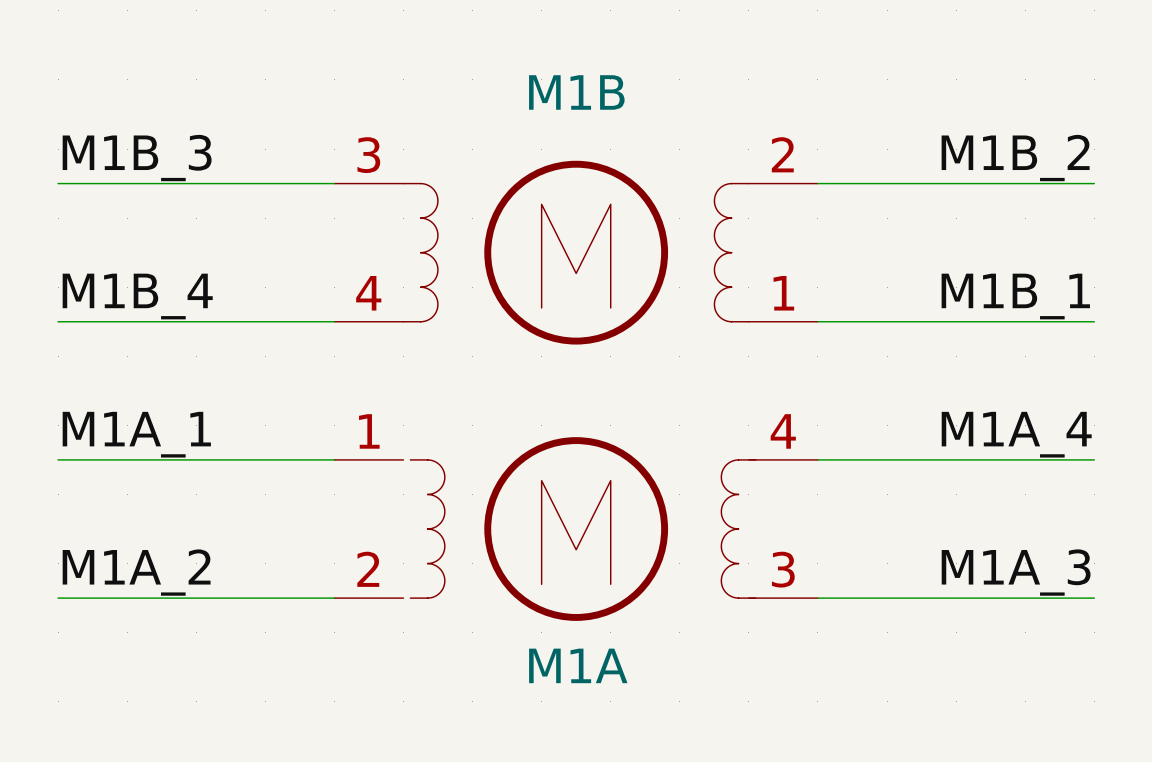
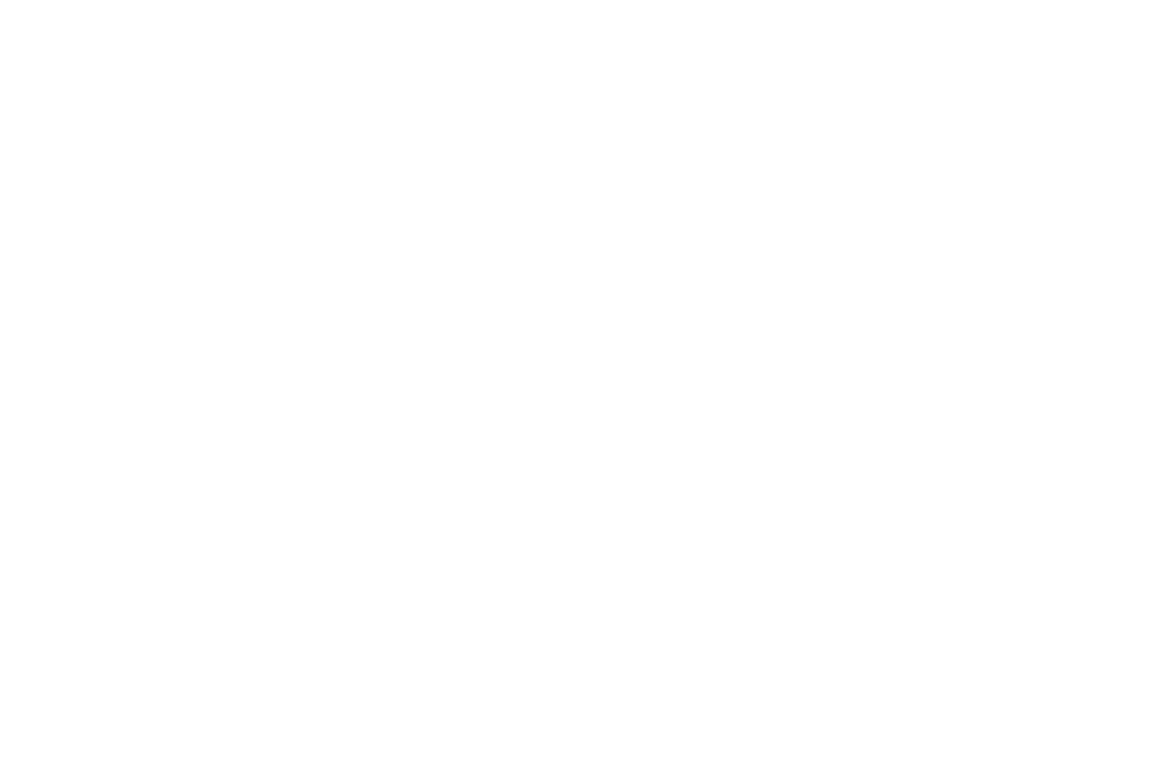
label: M1B_3 (137, 158) -> none
label: M1B_2 (1015, 158) -> none
wire: (58, 183) (334, 183) -> none
wire: (817, 183) (1094, 183) -> none
M1B: (576, 252) -> none
label: M1B_4 (137, 296) -> none
label: M1B_1 (1015, 296) -> none
wire: (58, 321) (334, 321) -> none
wire: (817, 321) (1094, 321) -> none
label: M1A_1 (136, 434) -> none
label: M1A_4 (1016, 434) -> none
wire: (58, 459) (334, 459) -> none
wire: (817, 459) (1094, 459) -> none
M1A: (576, 529) -> none
label: M1A_2 (136, 572) -> none
label: M1A_3 (1016, 572) -> none
wire: (58, 598) (334, 598) -> none
wire: (817, 598) (1094, 598) -> none

